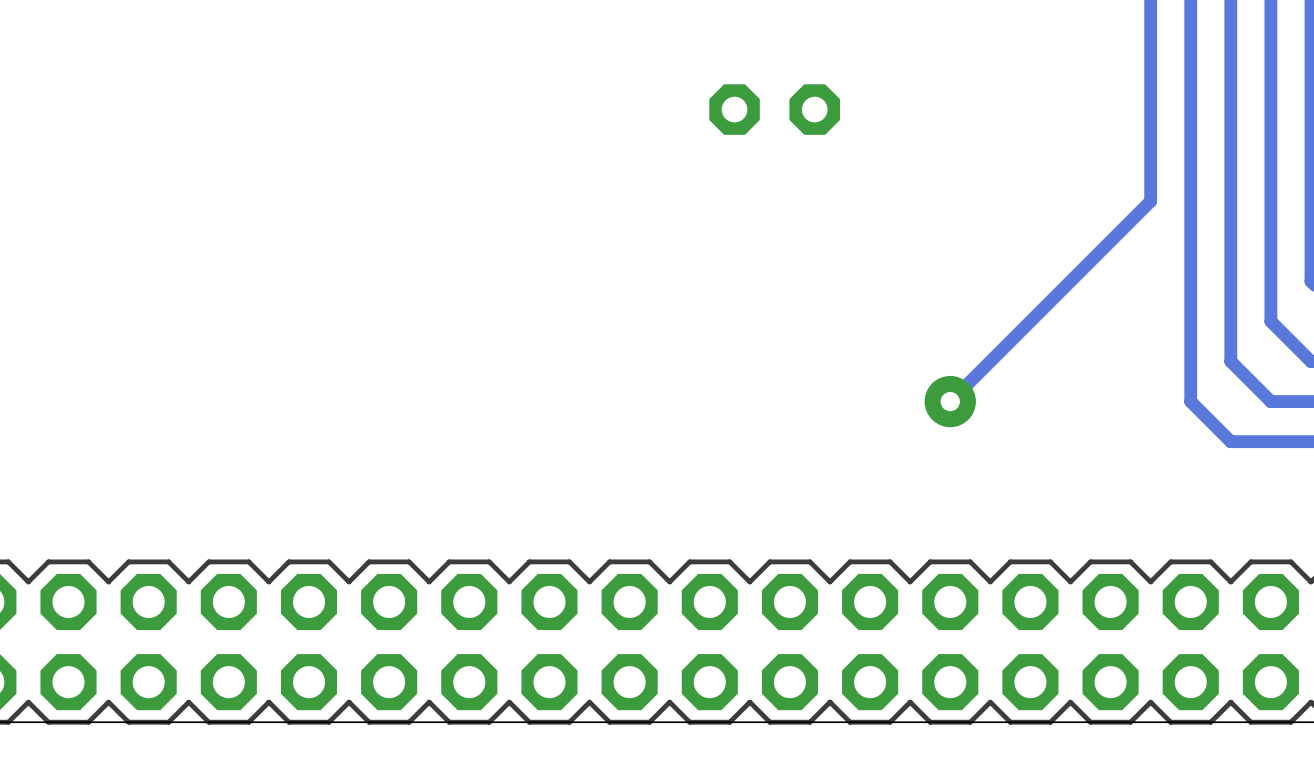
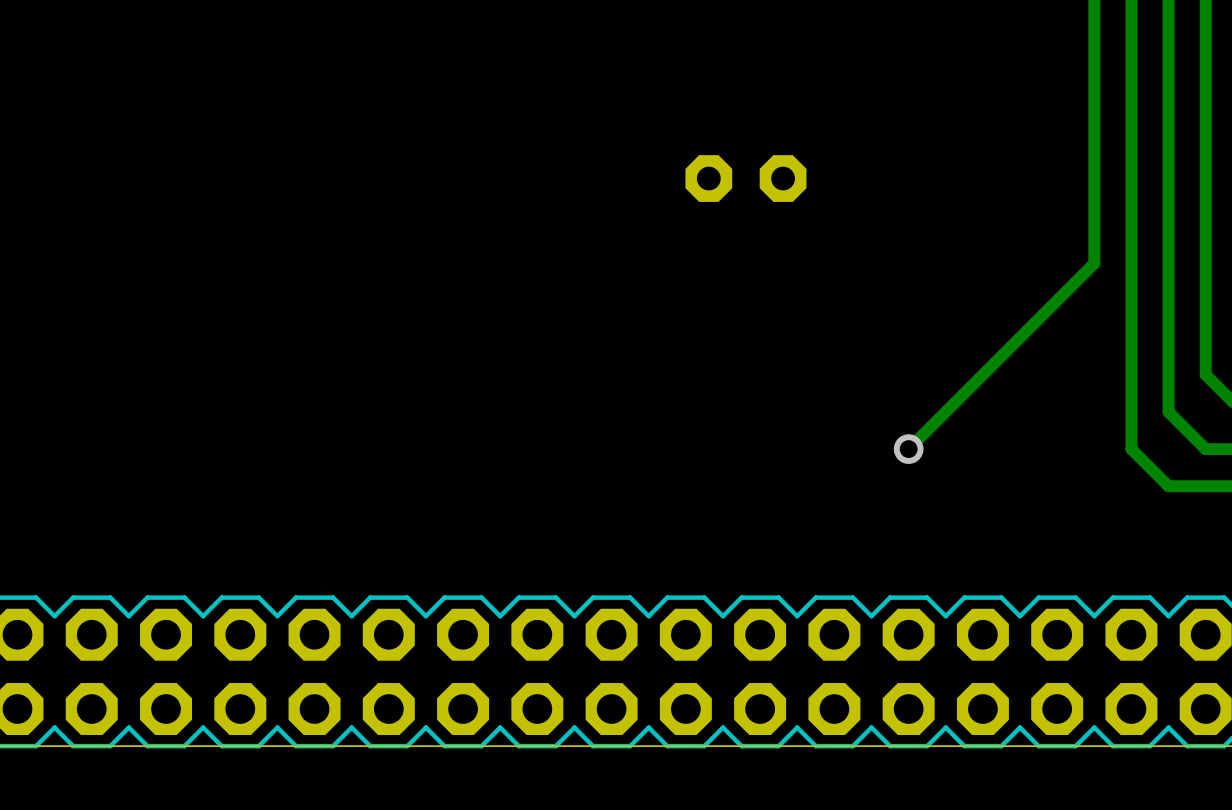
via size: [924, 375, 976, 428] -> [893, 434, 924, 464]

